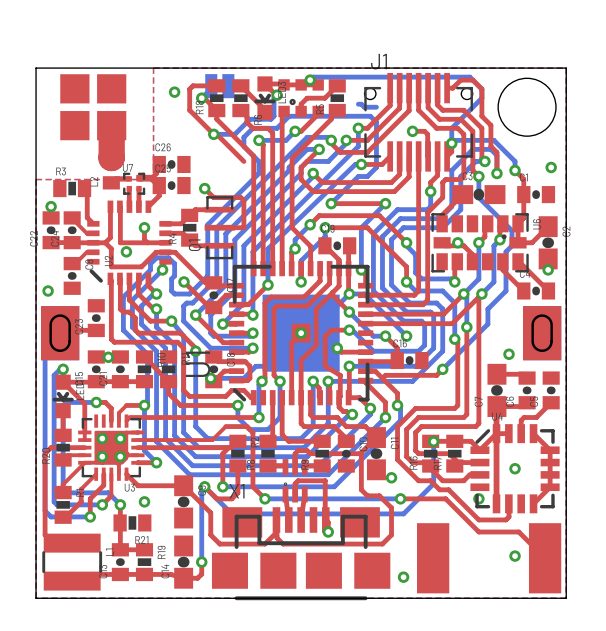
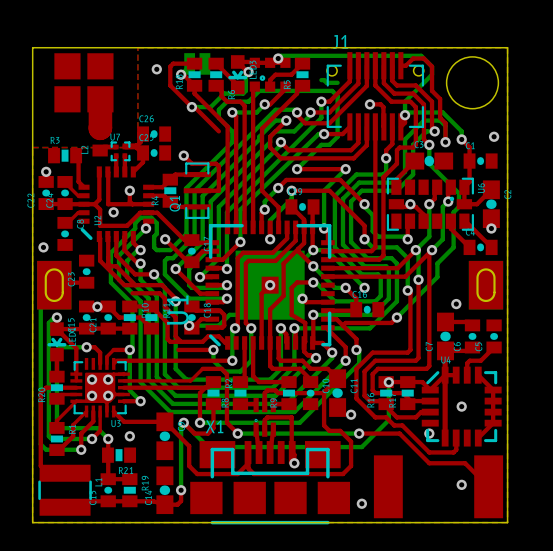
top track: (111, 306) (111, 339) (114, 342) (147, 342) -> (100, 260) (121, 282)
top track: (135, 318) (135, 330) -> (121, 271) (135, 285)
top track: none -> (108, 306) (119, 317) (140, 317) (151, 328)
top track: (144, 356) (168, 381) (168, 393) (180, 405) (198, 405) -> (129, 306) (151, 306) (167, 322) (167, 339)
top track: (183, 357) (183, 390) (186, 393) -> (164, 306) (175, 317) (175, 336) (181, 341)

